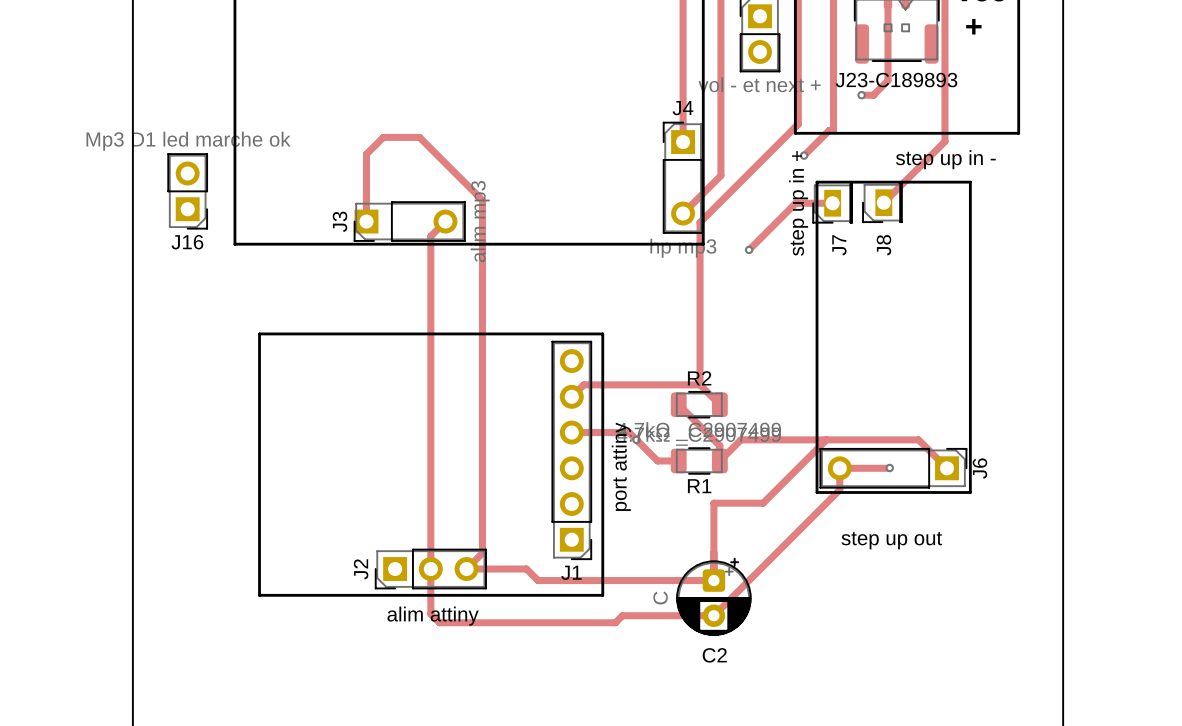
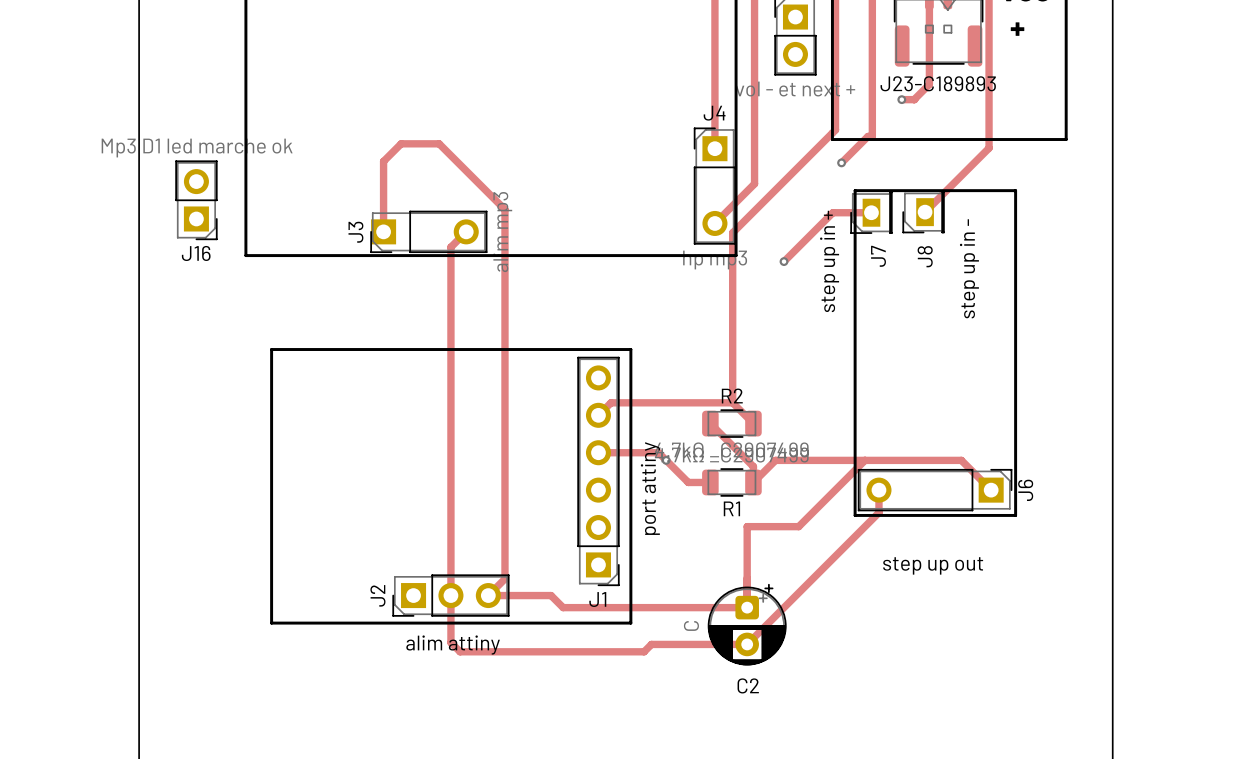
J8 value rotation: 0° (945, 159) -> 90° counterclockwise (969, 268)
J7 value position: step up in + (798, 203) -> step up in + (829, 261)
track: (889, 468) (839, 468) -> none
via: (889, 468) -> none

